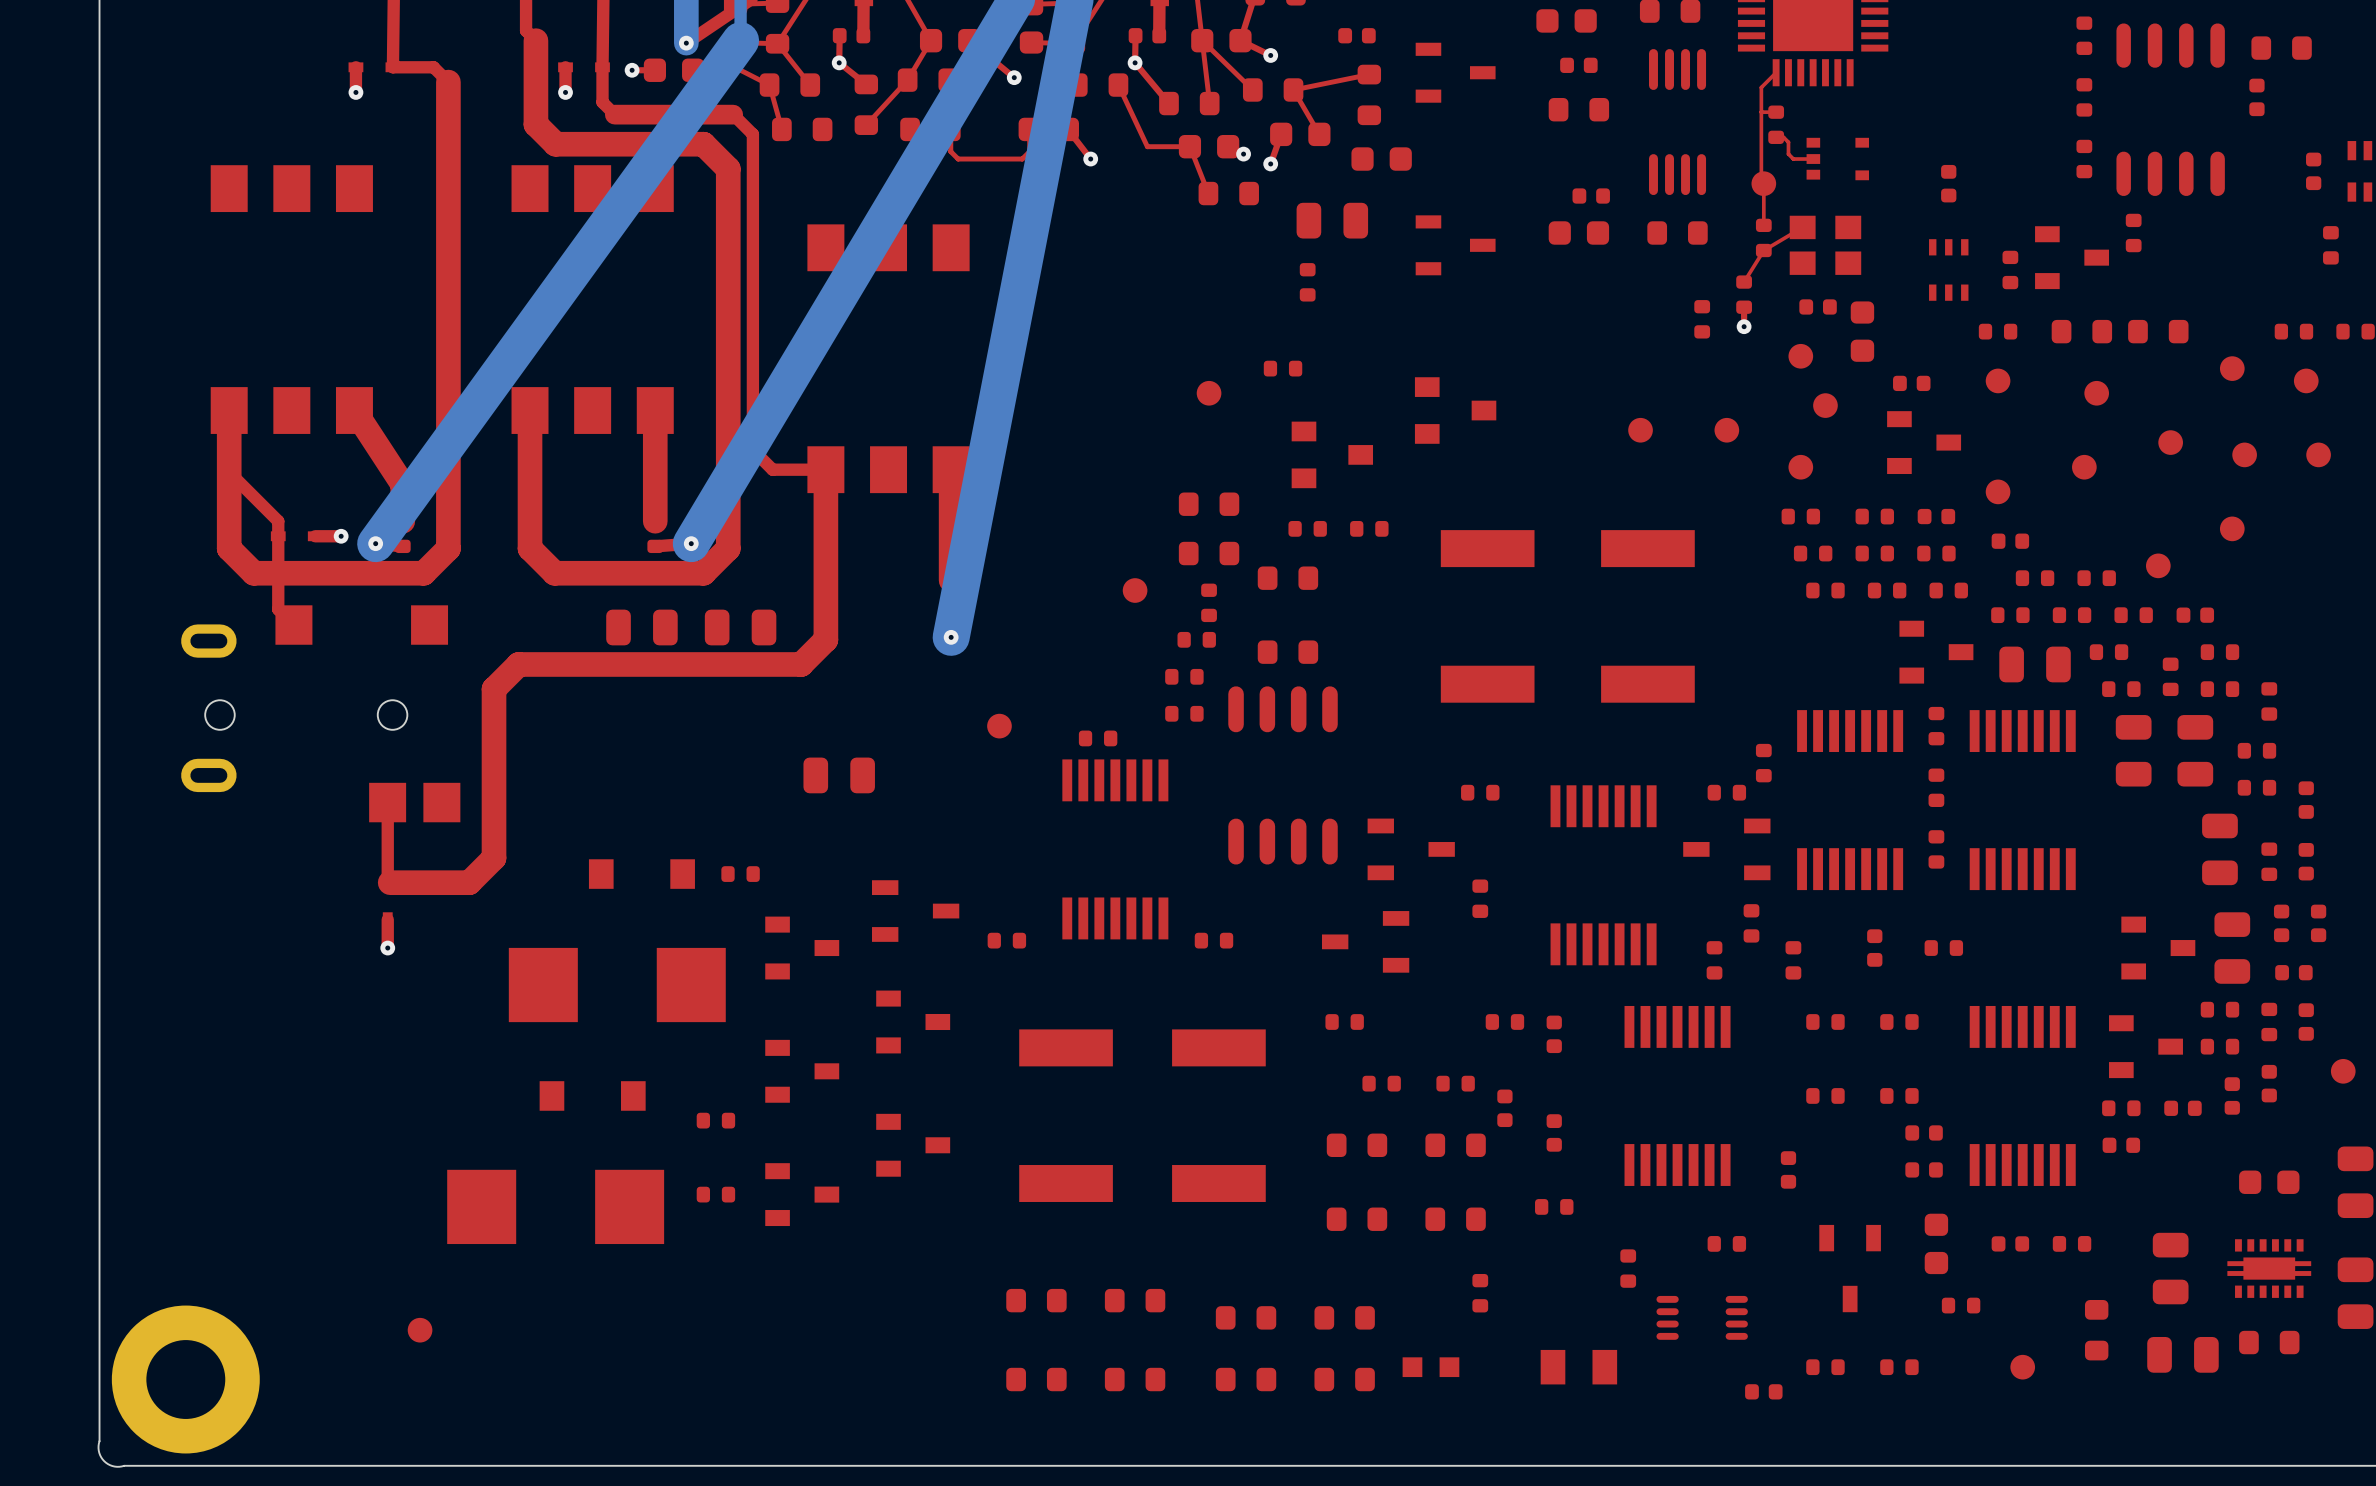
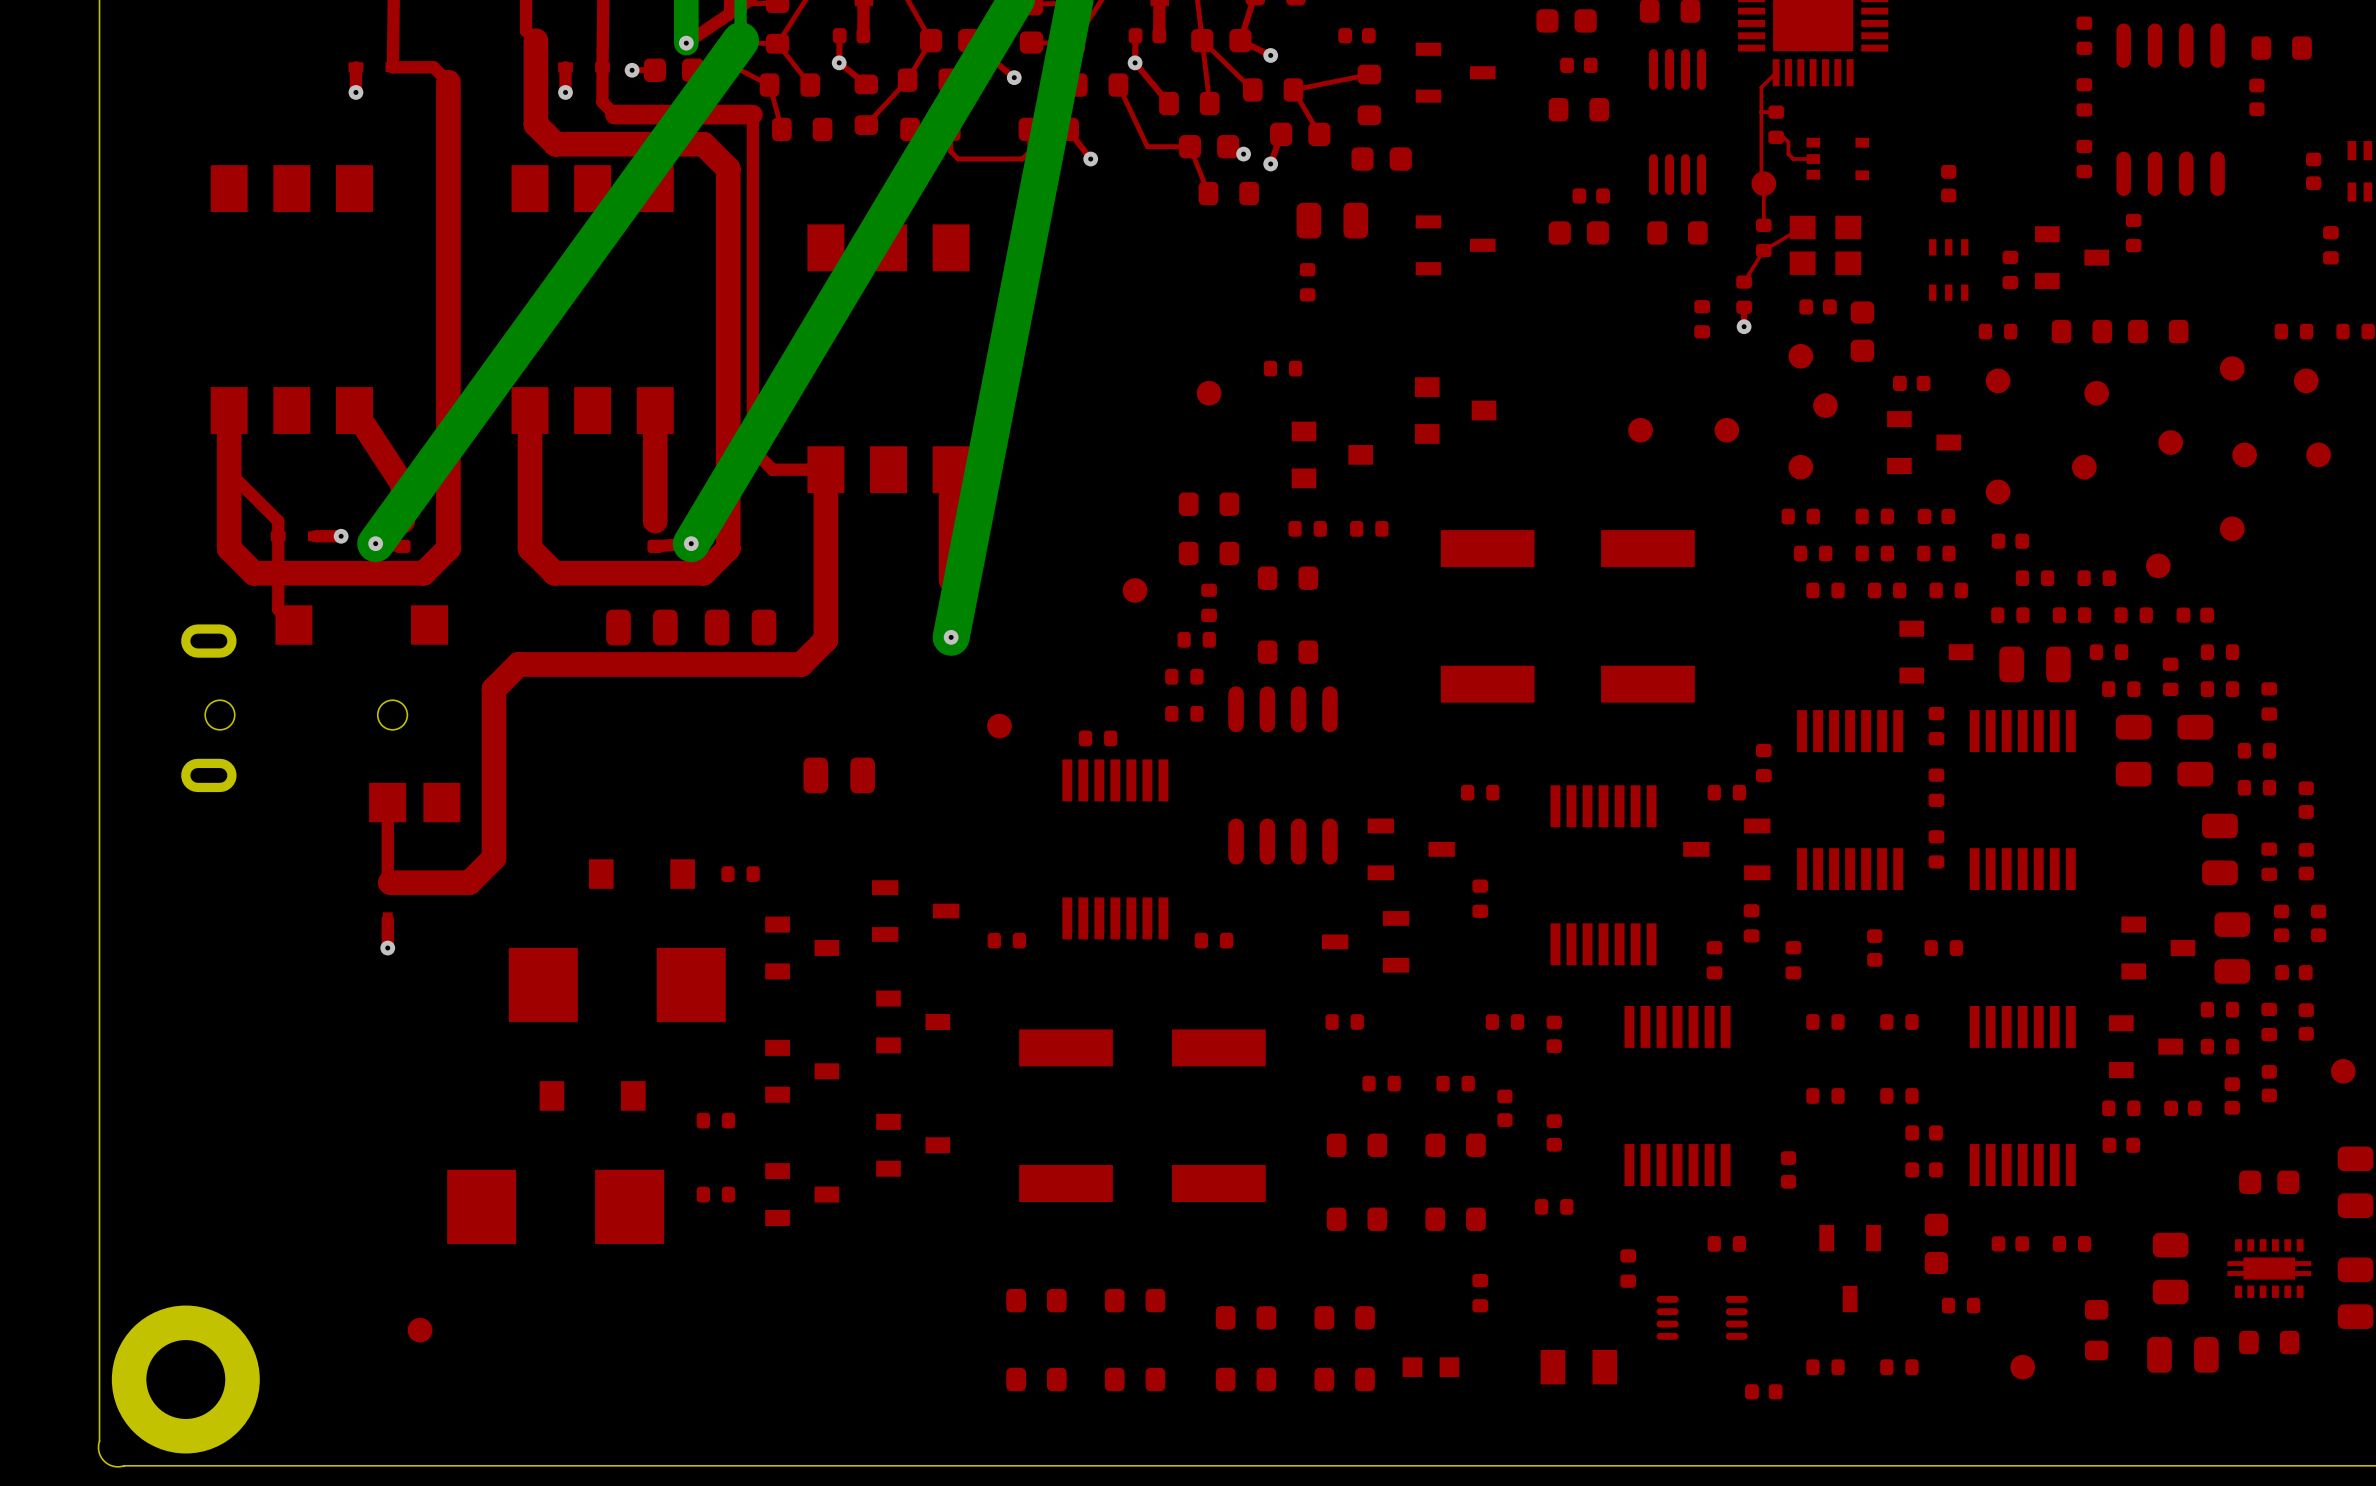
top track: (733, 114) (752, 134) -> (733, 114) (752, 114) (752, 134)

